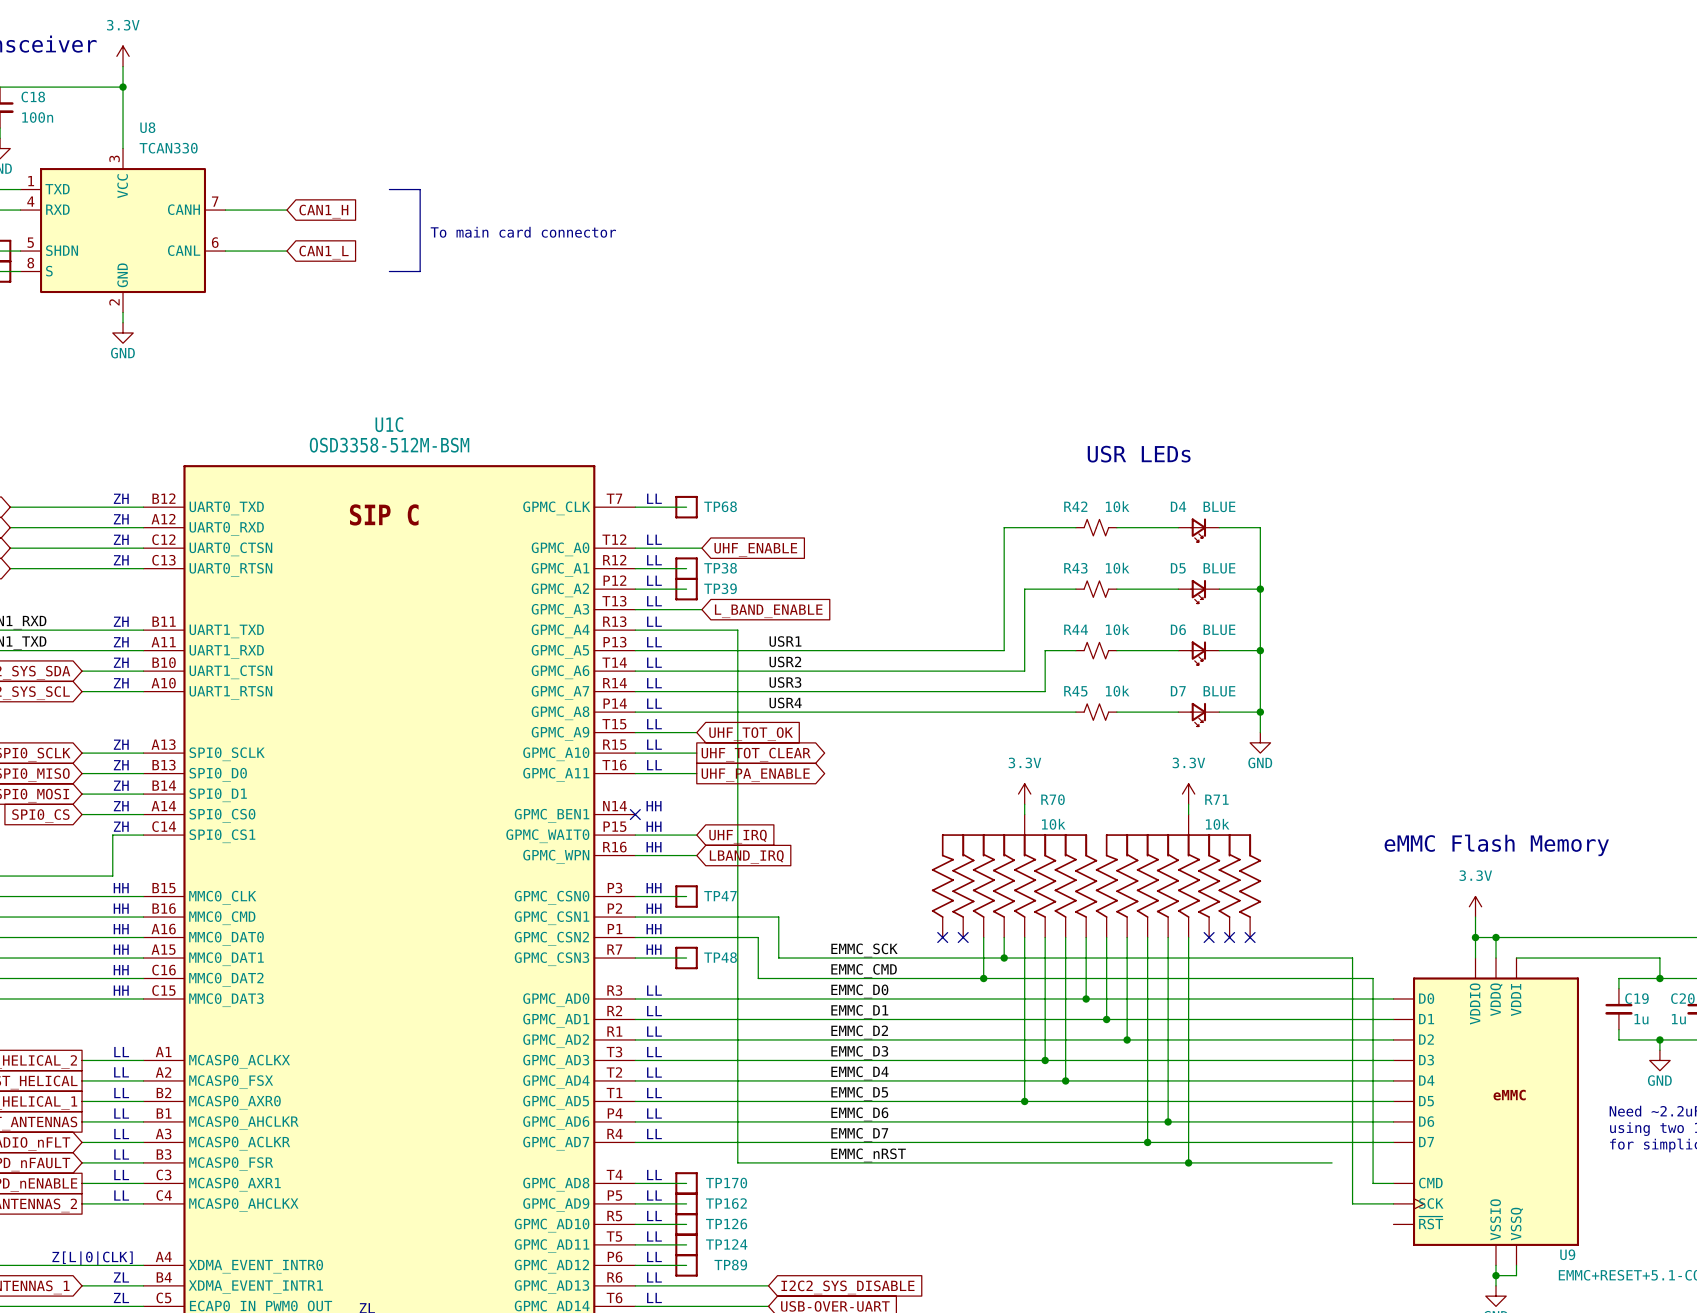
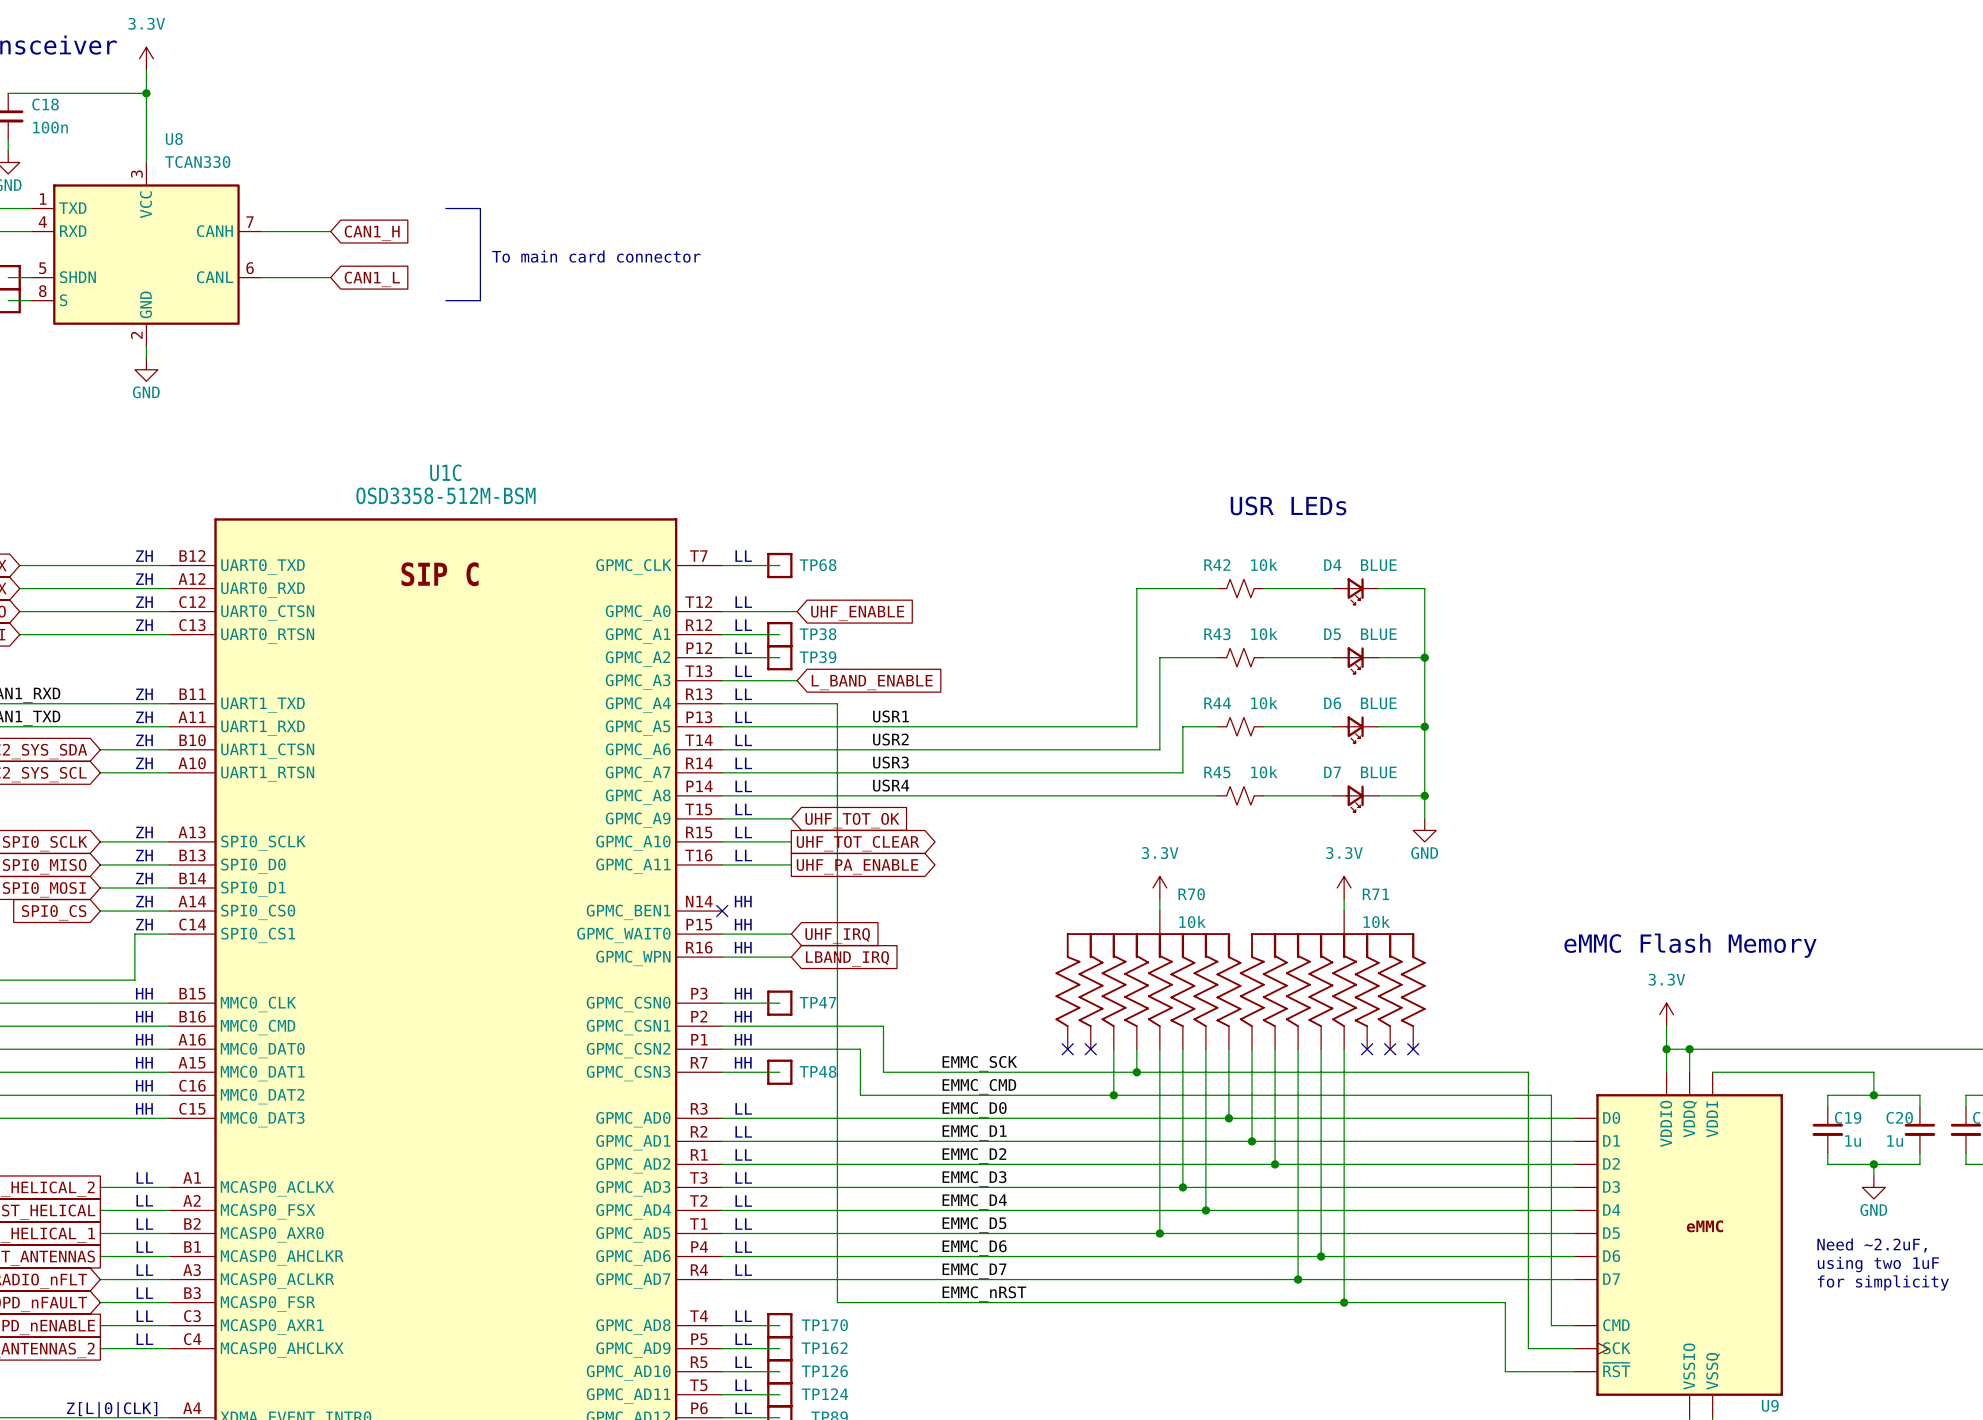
wire: none -> (1505, 1302) (1505, 1371) (1574, 1371)

